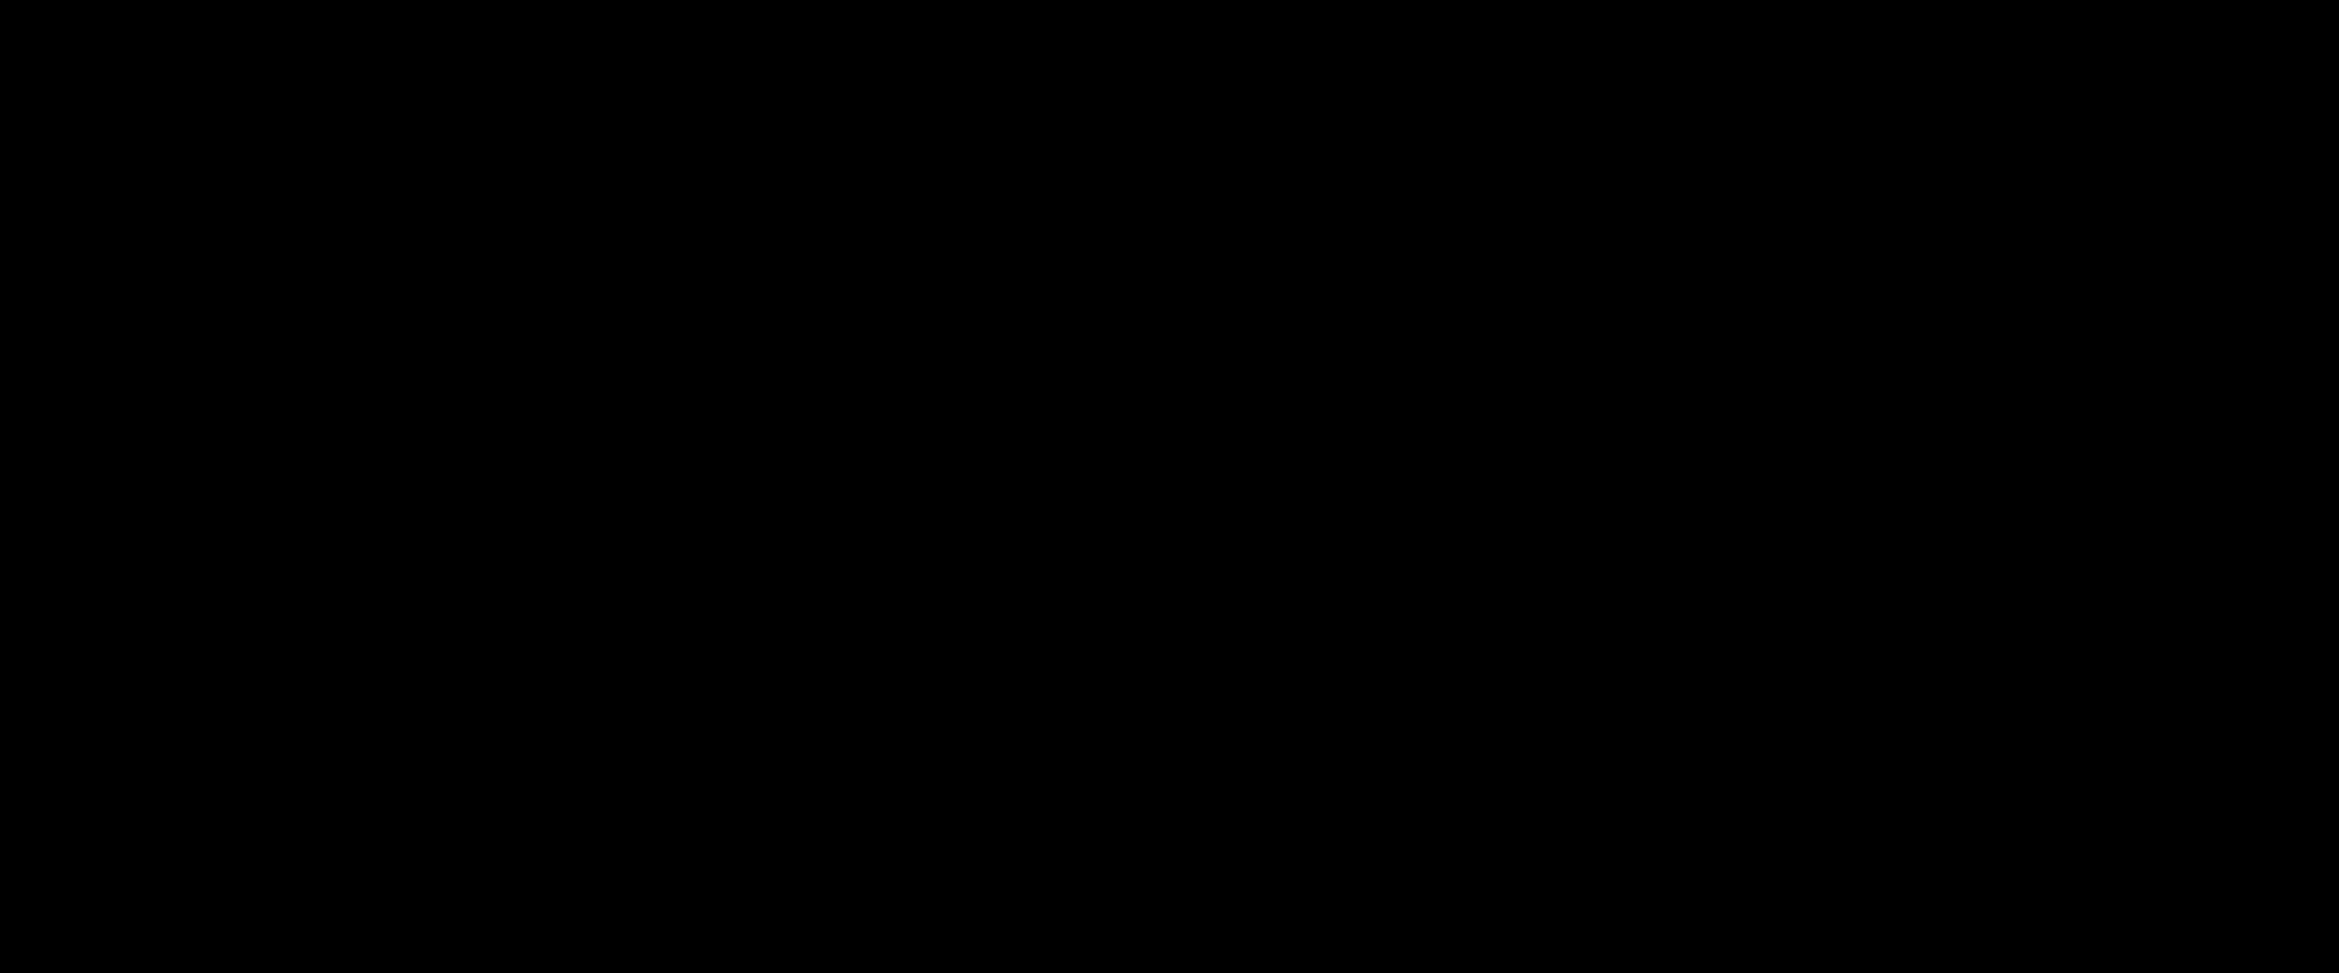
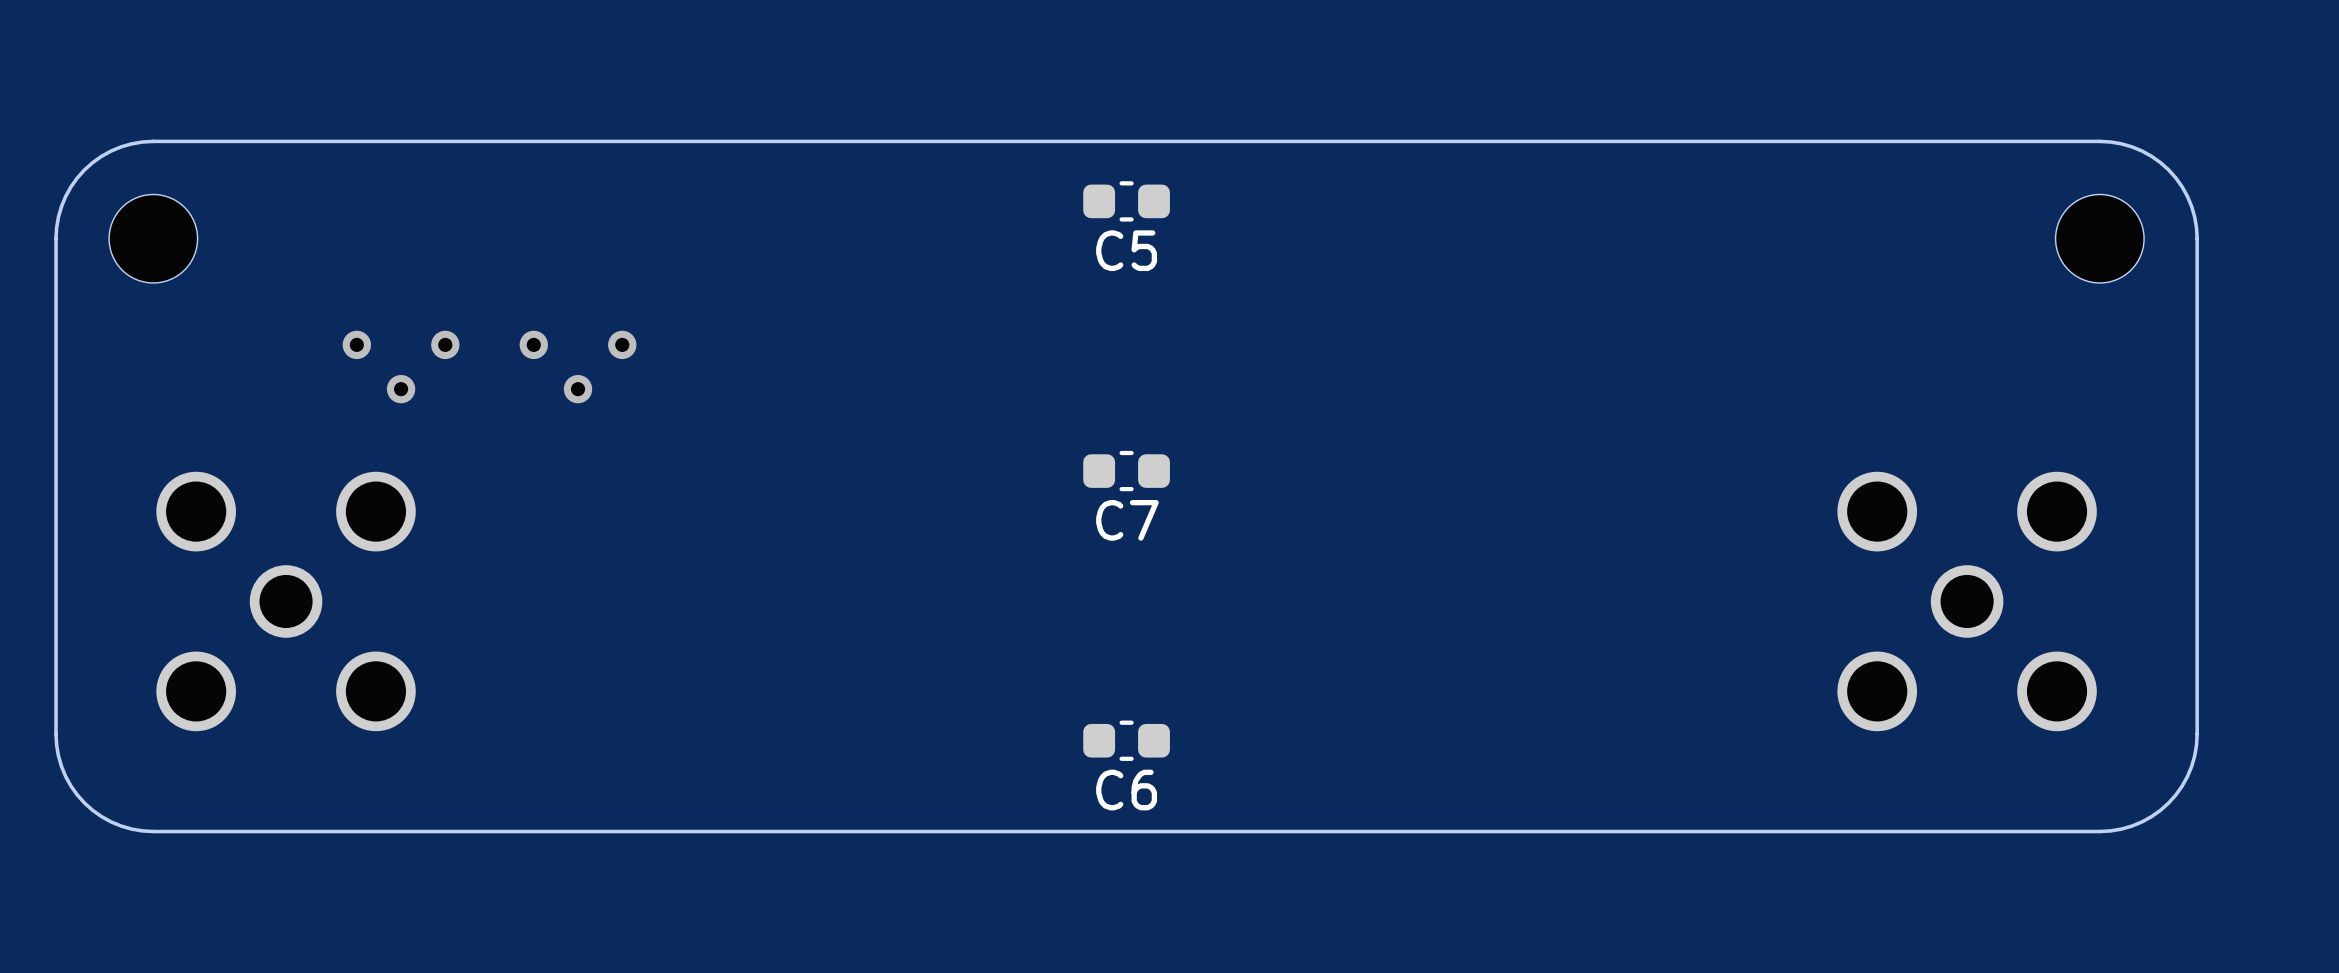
board edge: none -> (2099, 141) (153, 141) (121, 146) (92, 162) (77, 178) (61, 206) (56, 227) (56, 734) (61, 766) (77, 794) (92, 810) (121, 826) (153, 831) (2099, 831) (2131, 826) (2151, 816) (2175, 794) (2187, 776) (2196, 745) (2197, 238) (2191, 206) (2182, 186) (2168, 169) (2142, 151) (2121, 143) (2099, 141)
C5: none -> (1126, 201)
part: none -> (153, 238)
part: none -> (2099, 238)
via: none -> (356, 344)
via: none -> (445, 344)
via: none -> (533, 344)
via: none -> (622, 344)
via: none -> (401, 389)
via: none -> (578, 389)
C7: none -> (1126, 471)
part: none -> (286, 601)
part: none -> (1967, 601)
C6: none -> (1126, 740)

